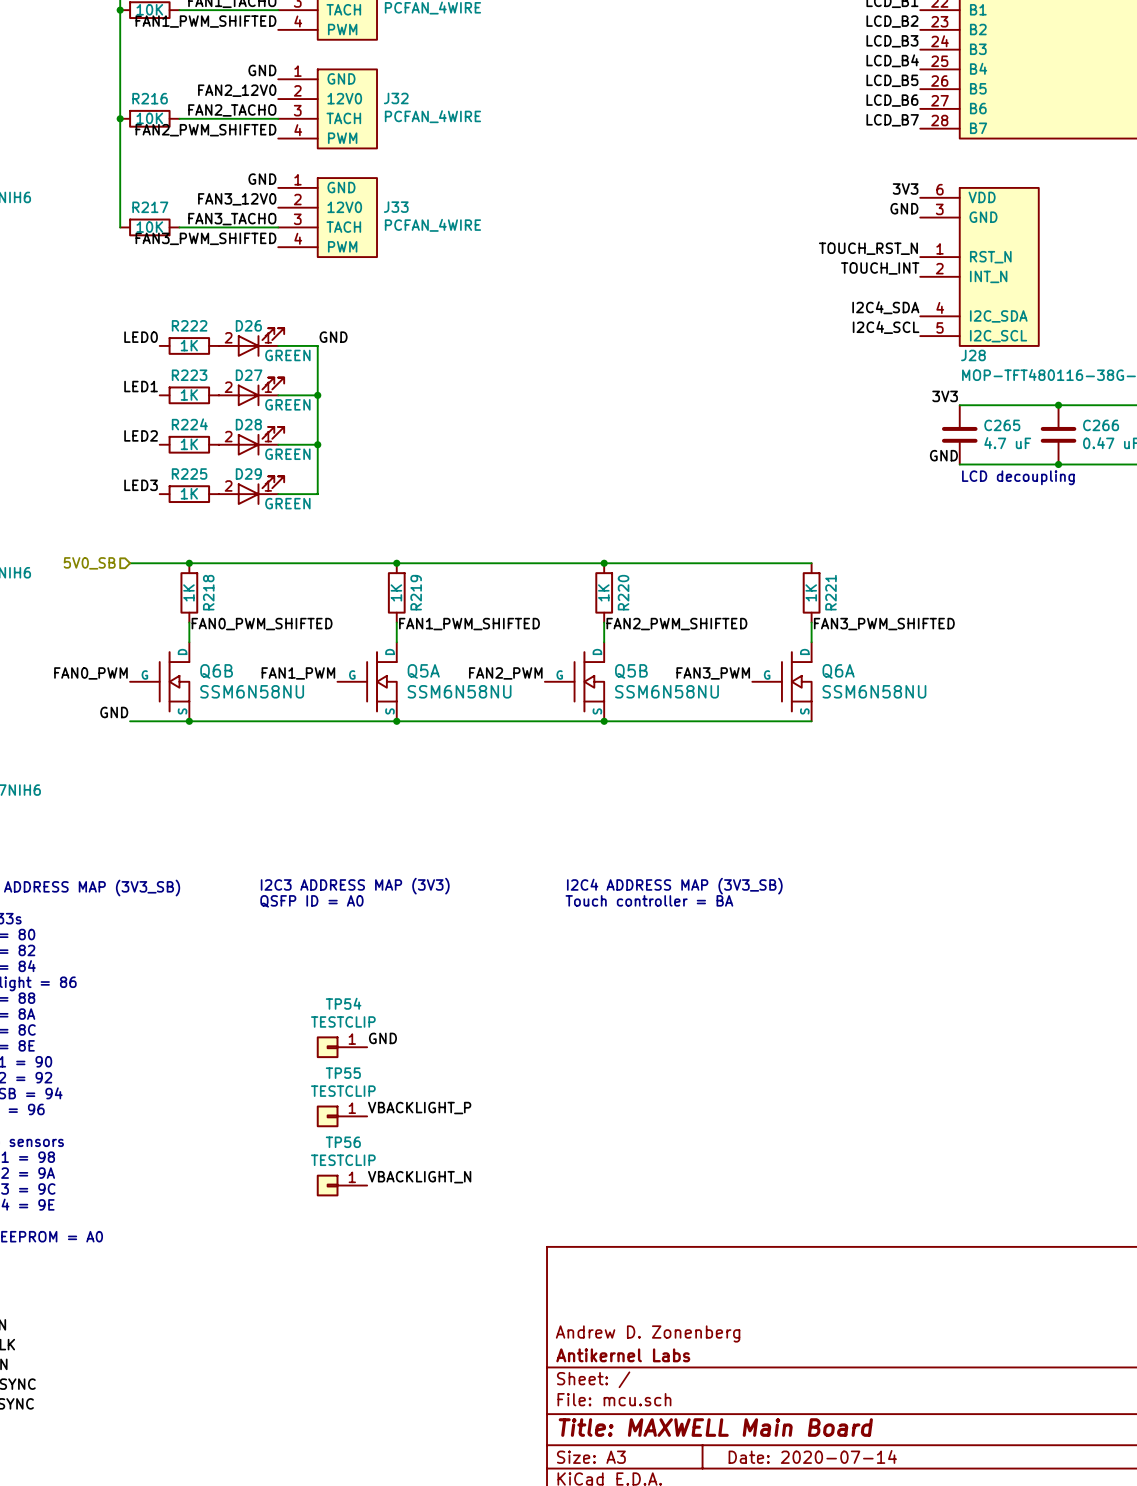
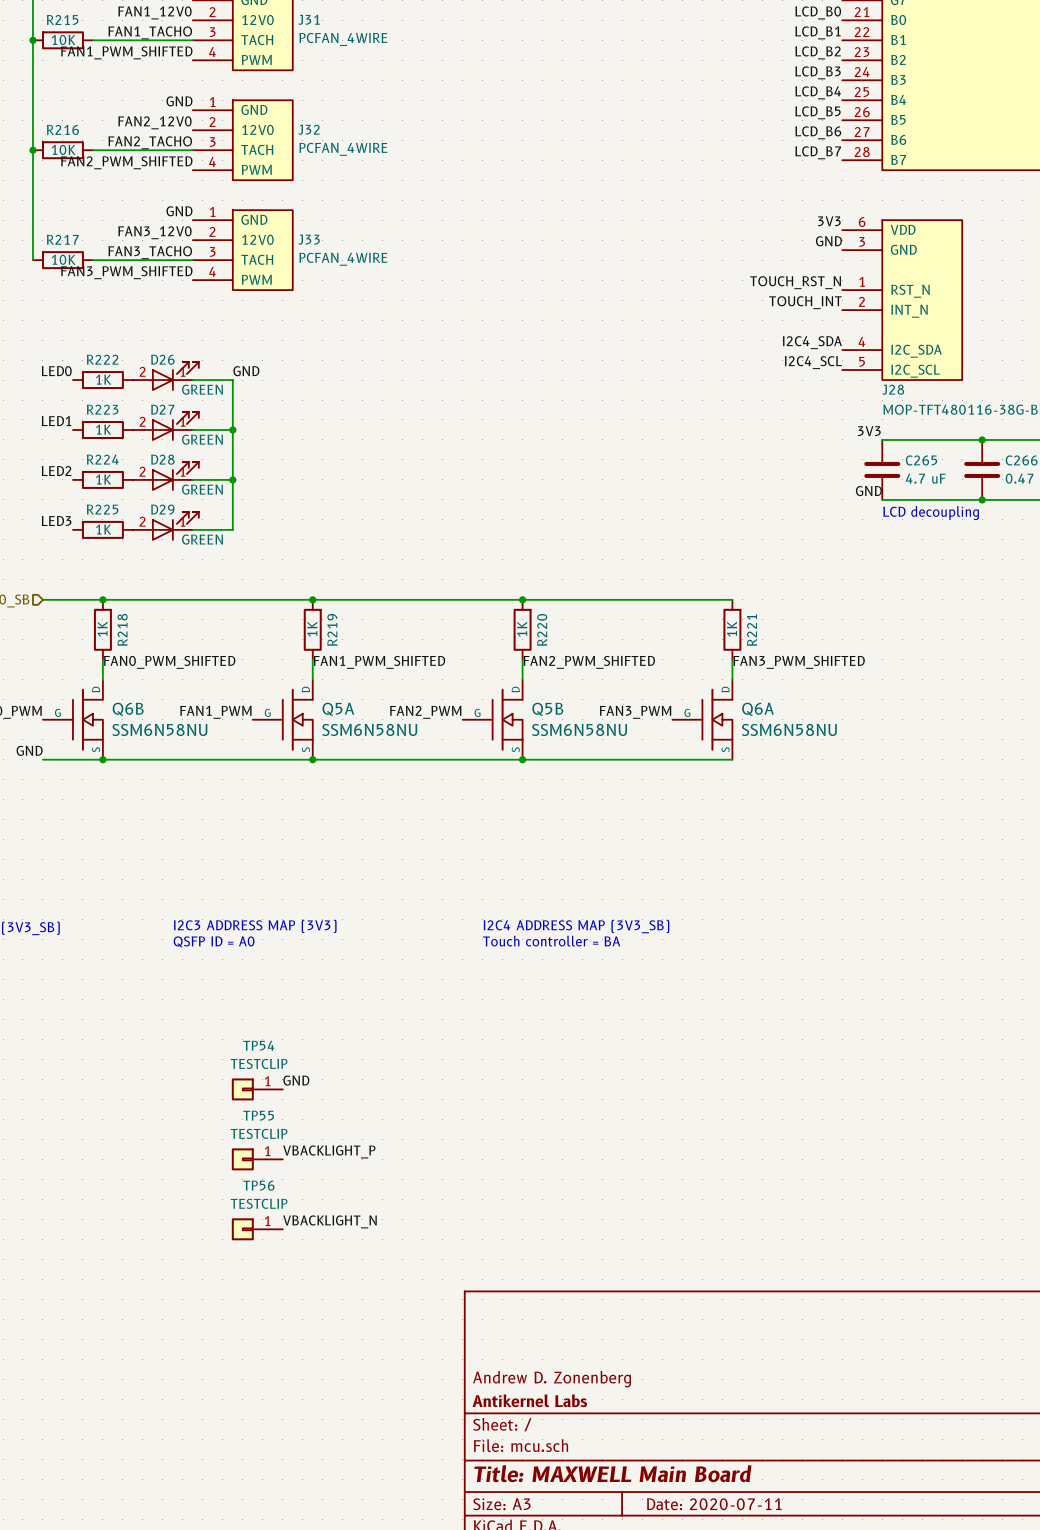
title block: Date: 2020-07-14 (812, 1456) -> Date: 2020-07-11 (714, 1504)

